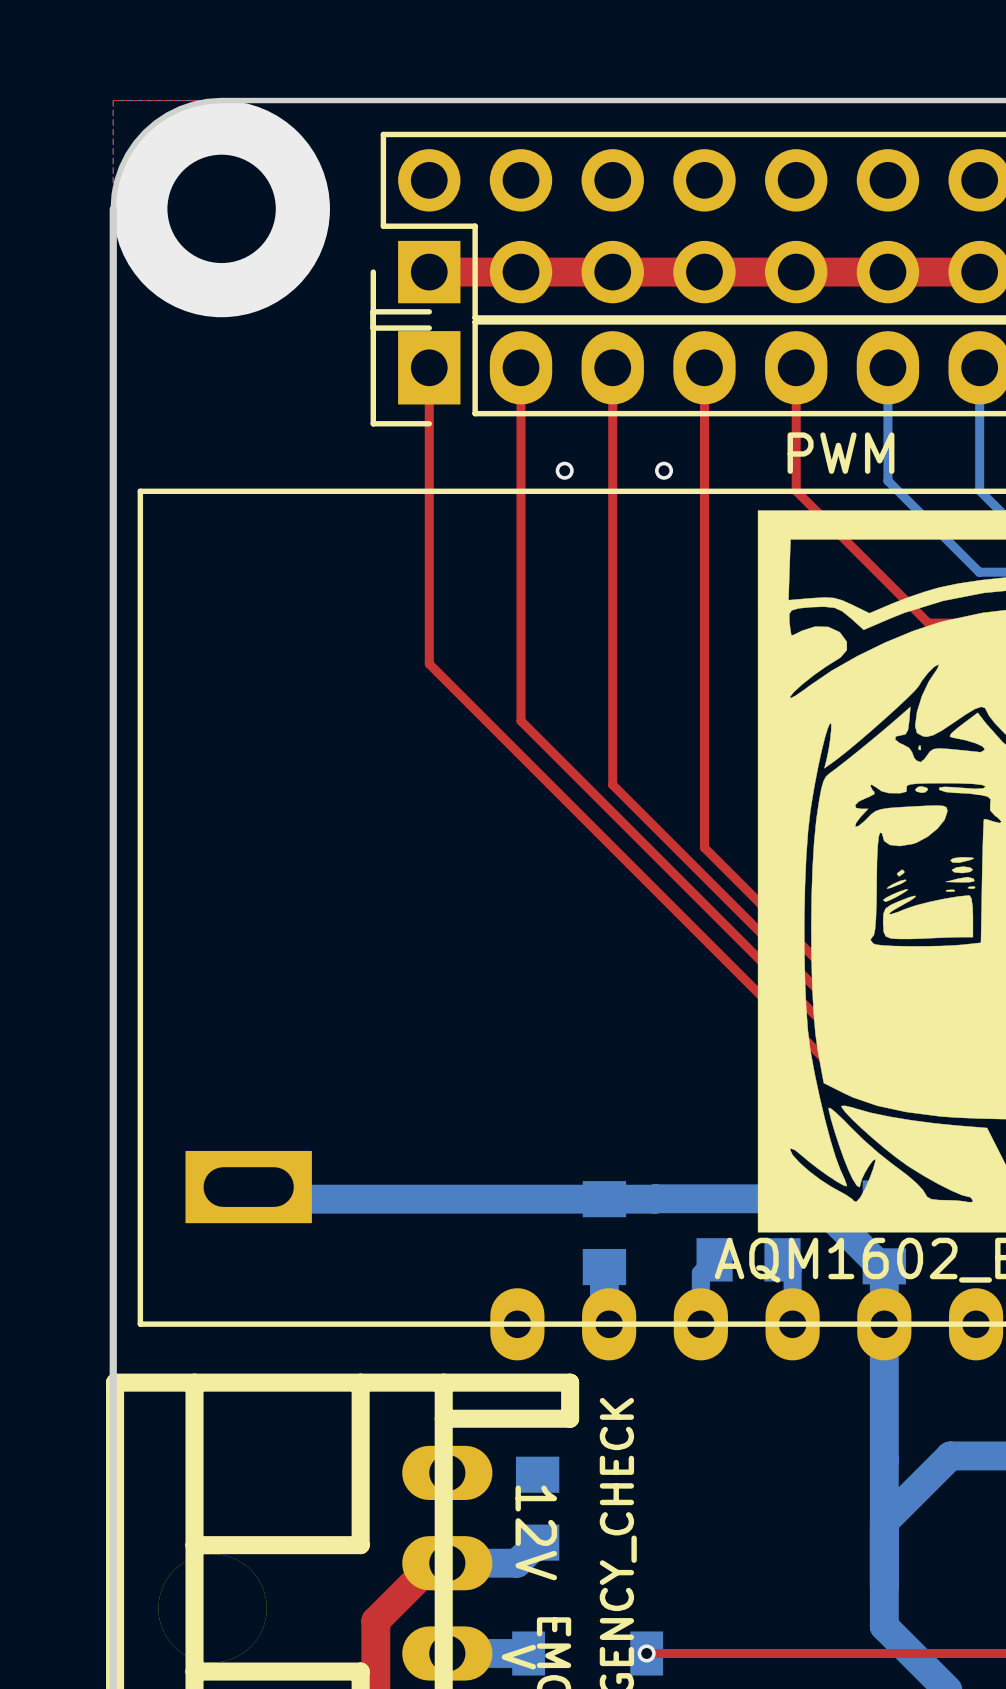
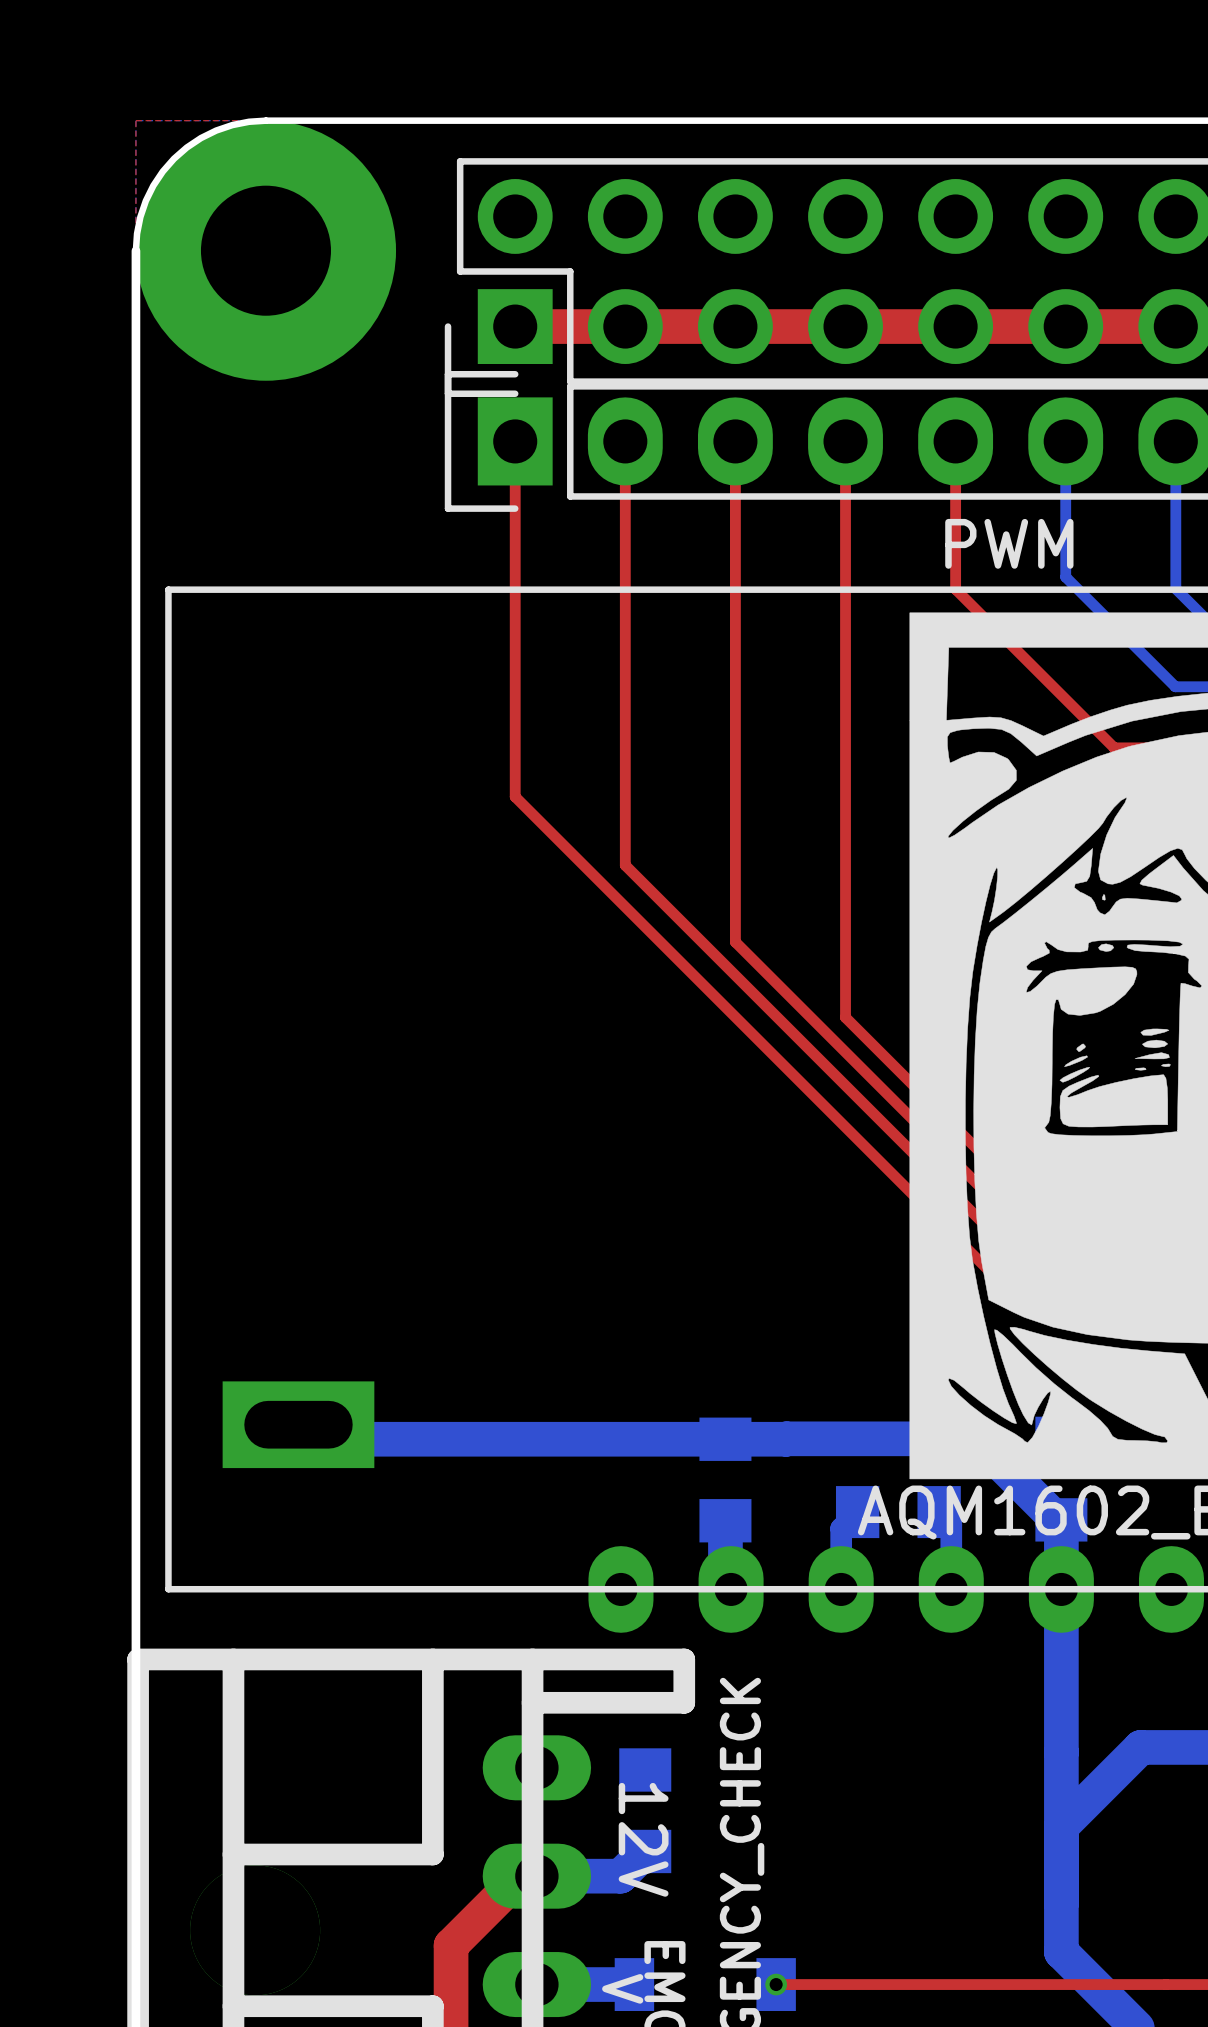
via: (564, 470) -> none
via: (664, 470) -> none

